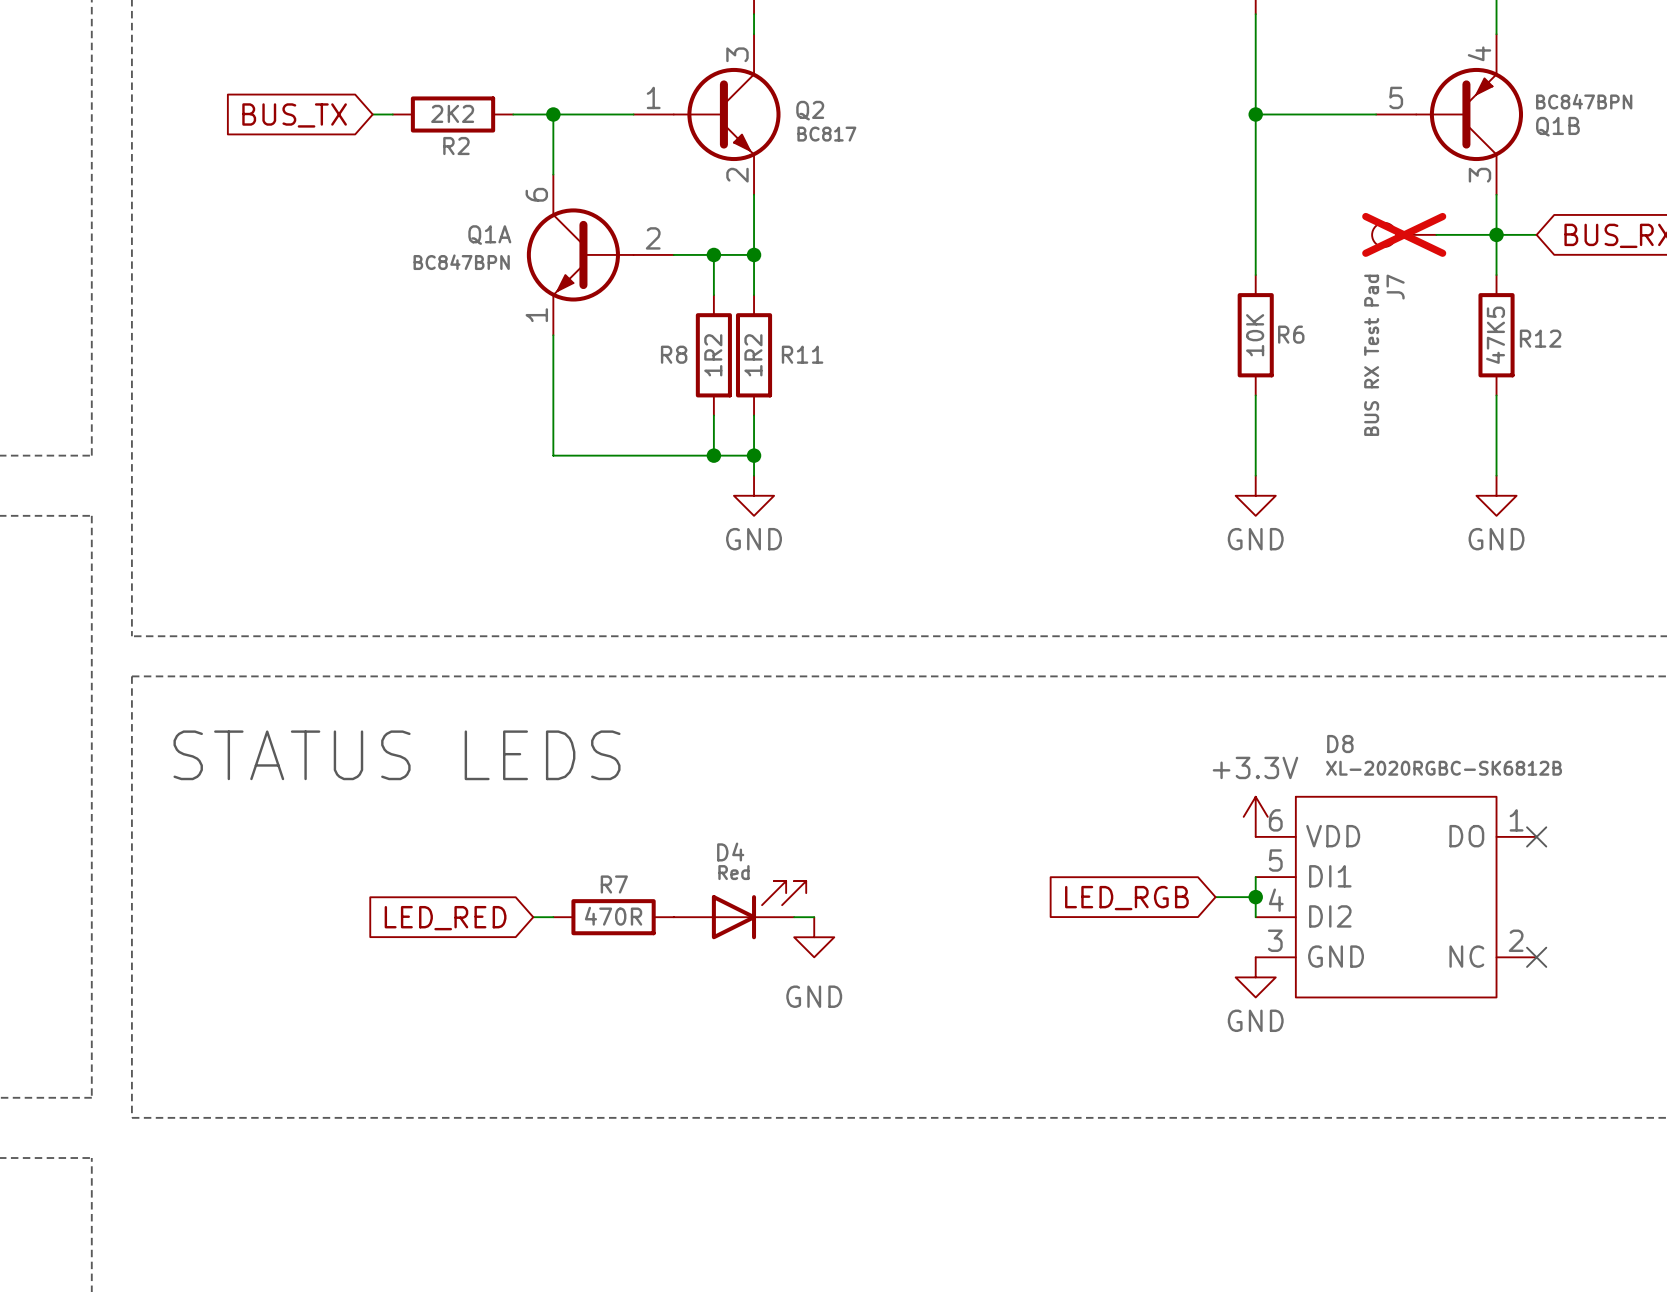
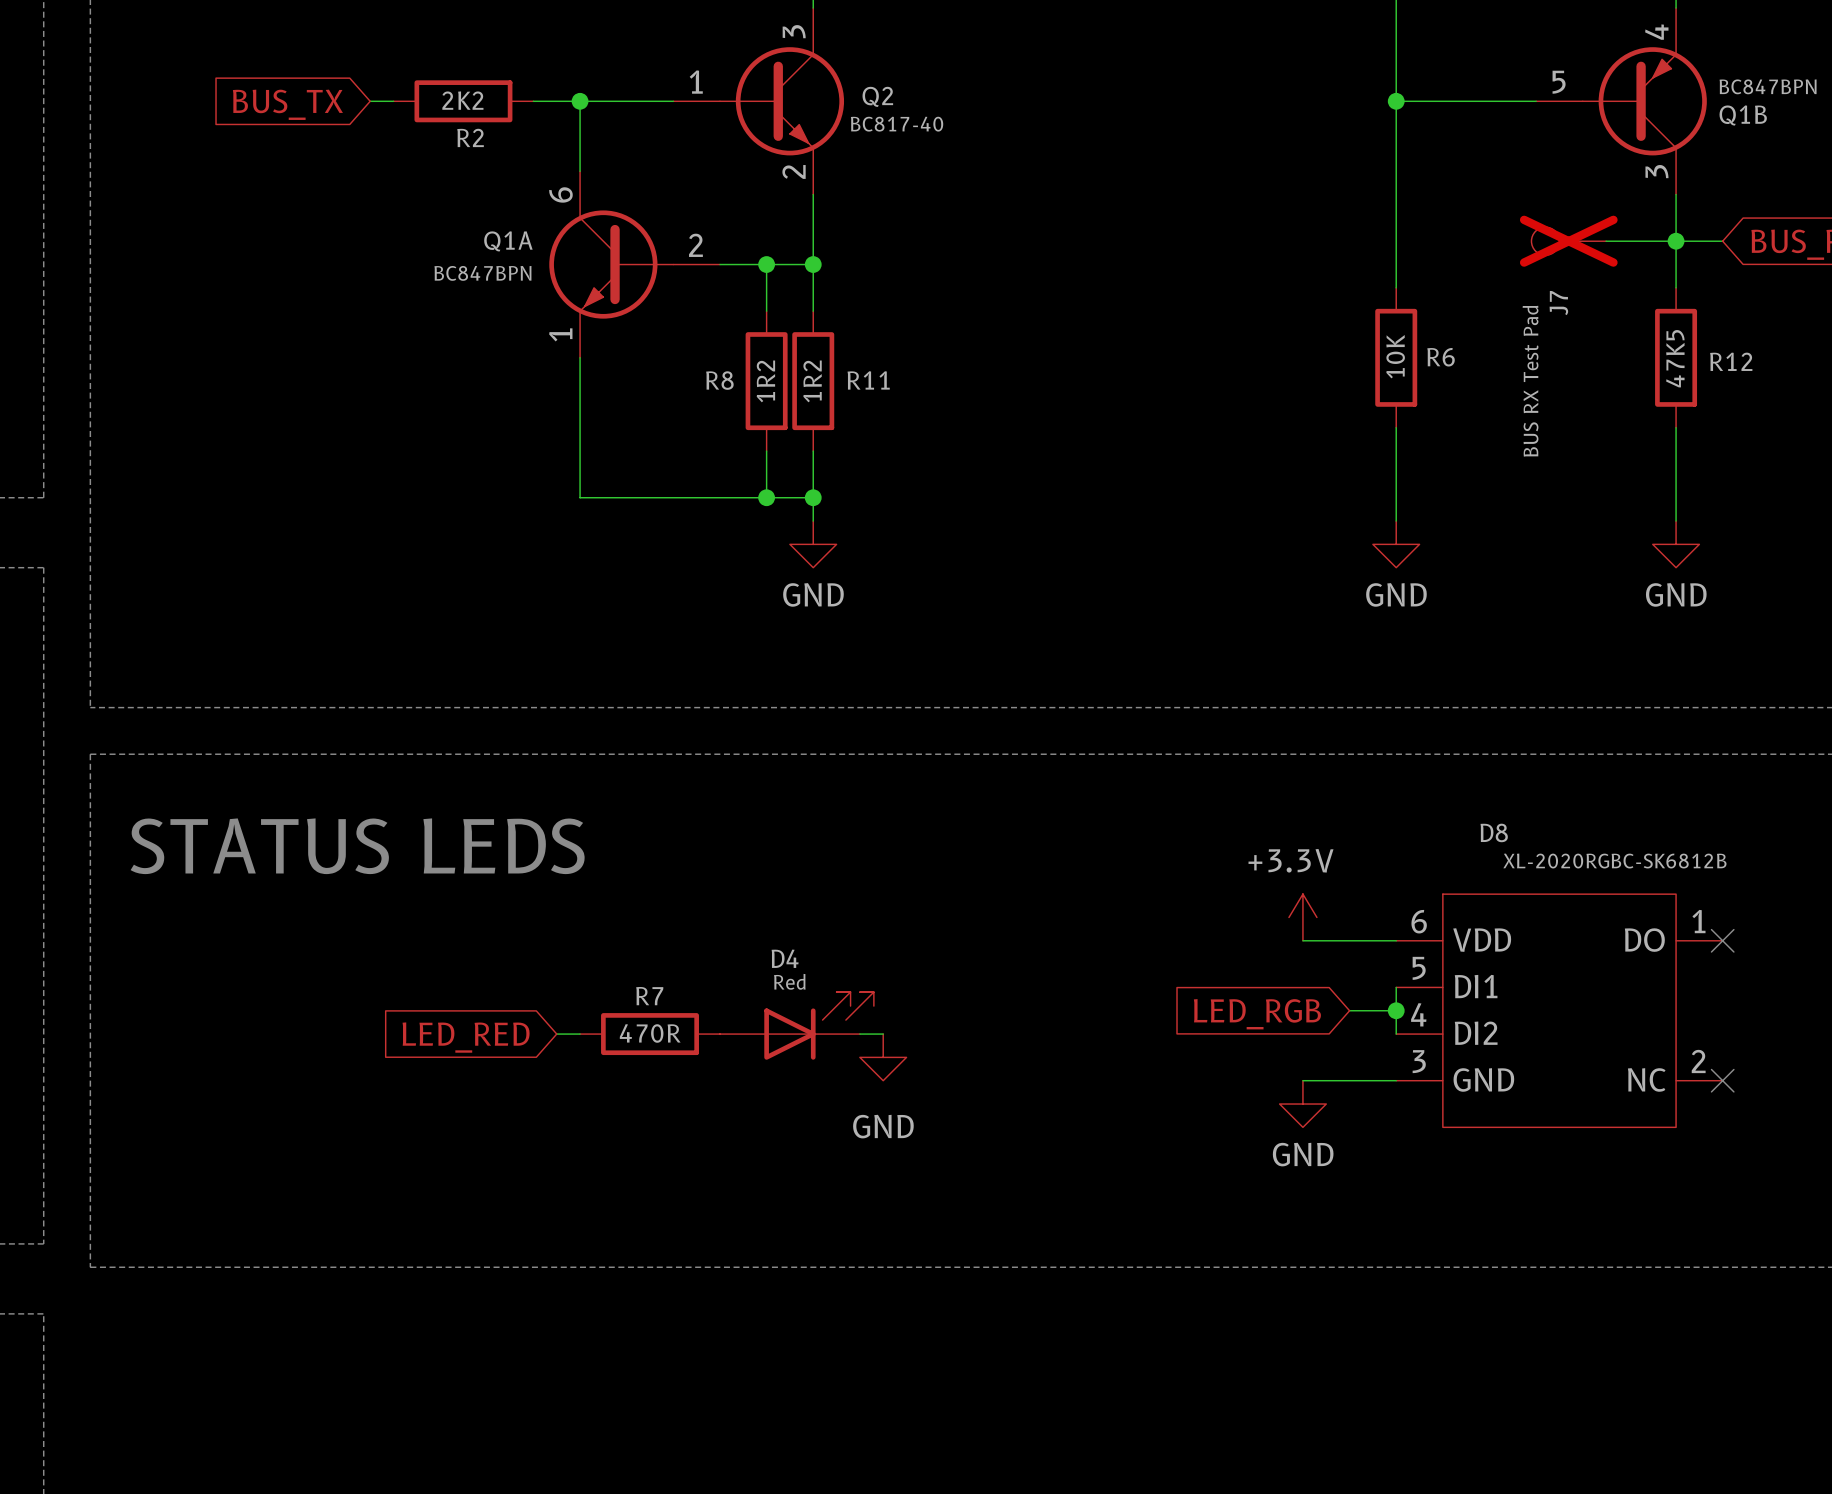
Q2 value: BC817 (826, 134) -> BC817-40 (897, 124)
power symbol position: +3.3V (1255, 816) -> +3.3V (1302, 917)
wire: none -> (1302, 940) (1396, 940)
wire: none -> (1302, 1080) (1396, 1080)
power symbol position: GND (1255, 977) -> GND (1302, 1104)

